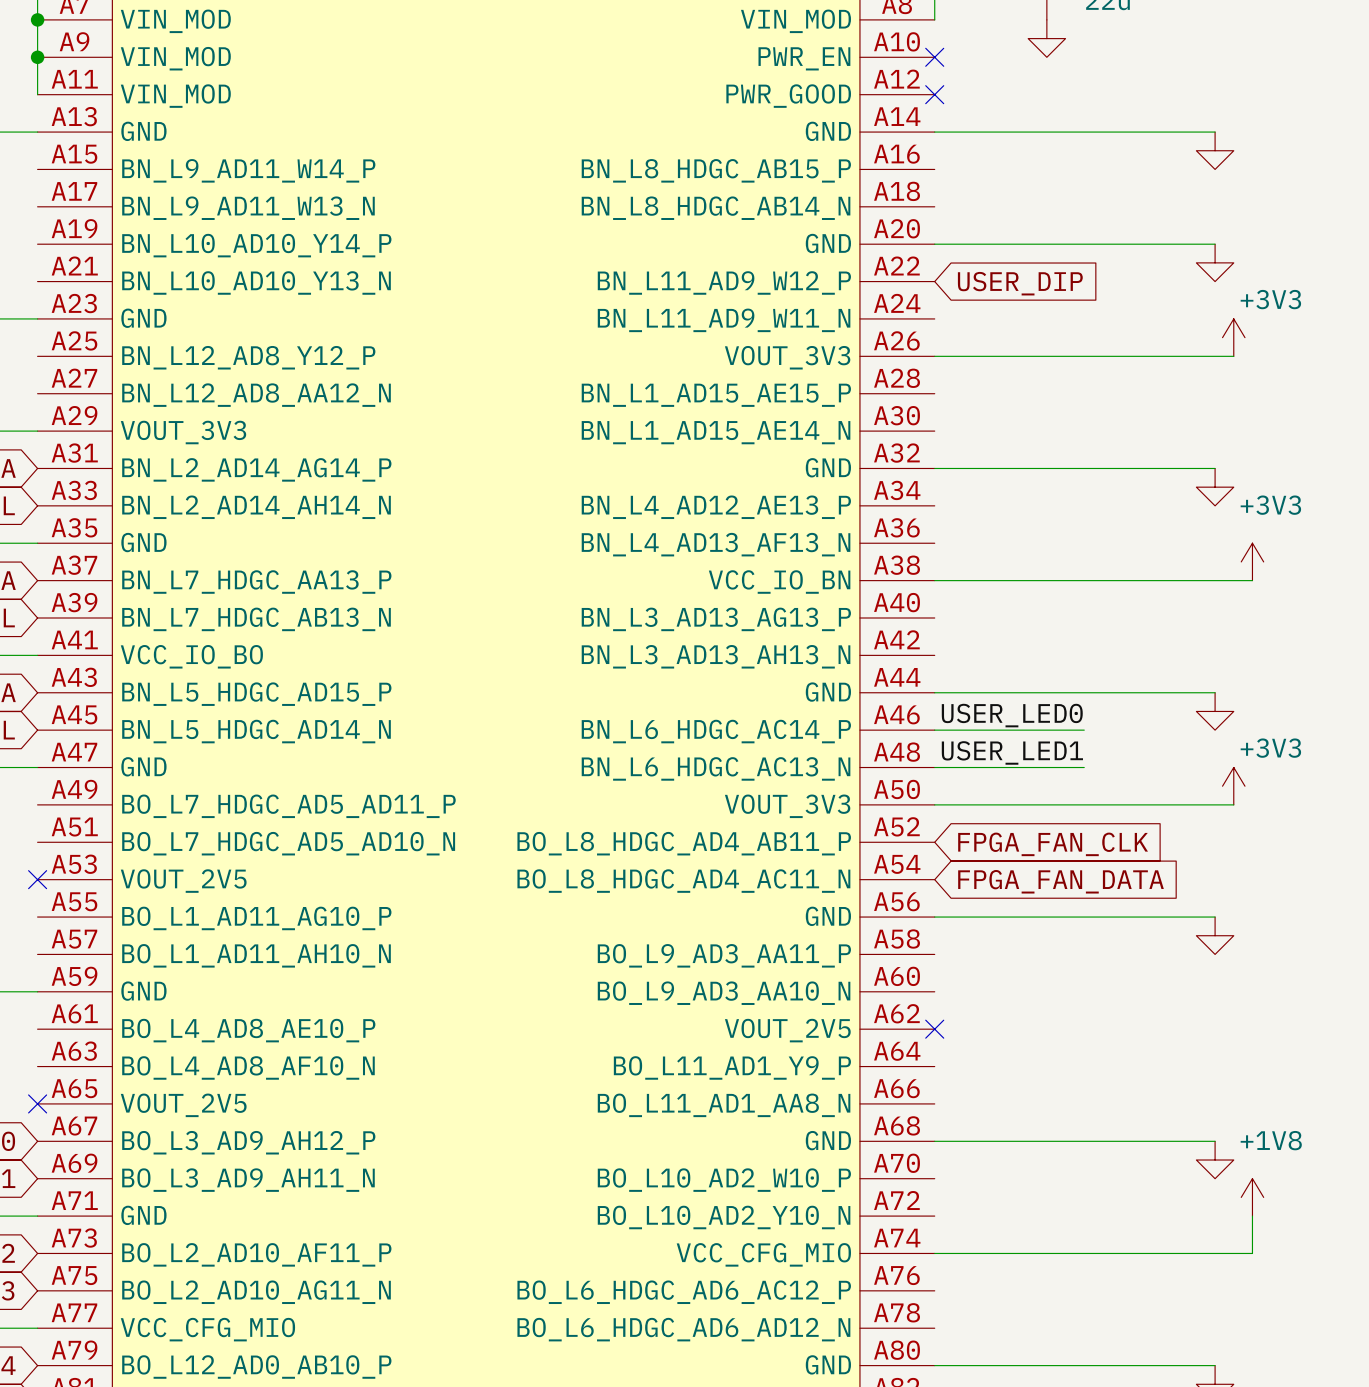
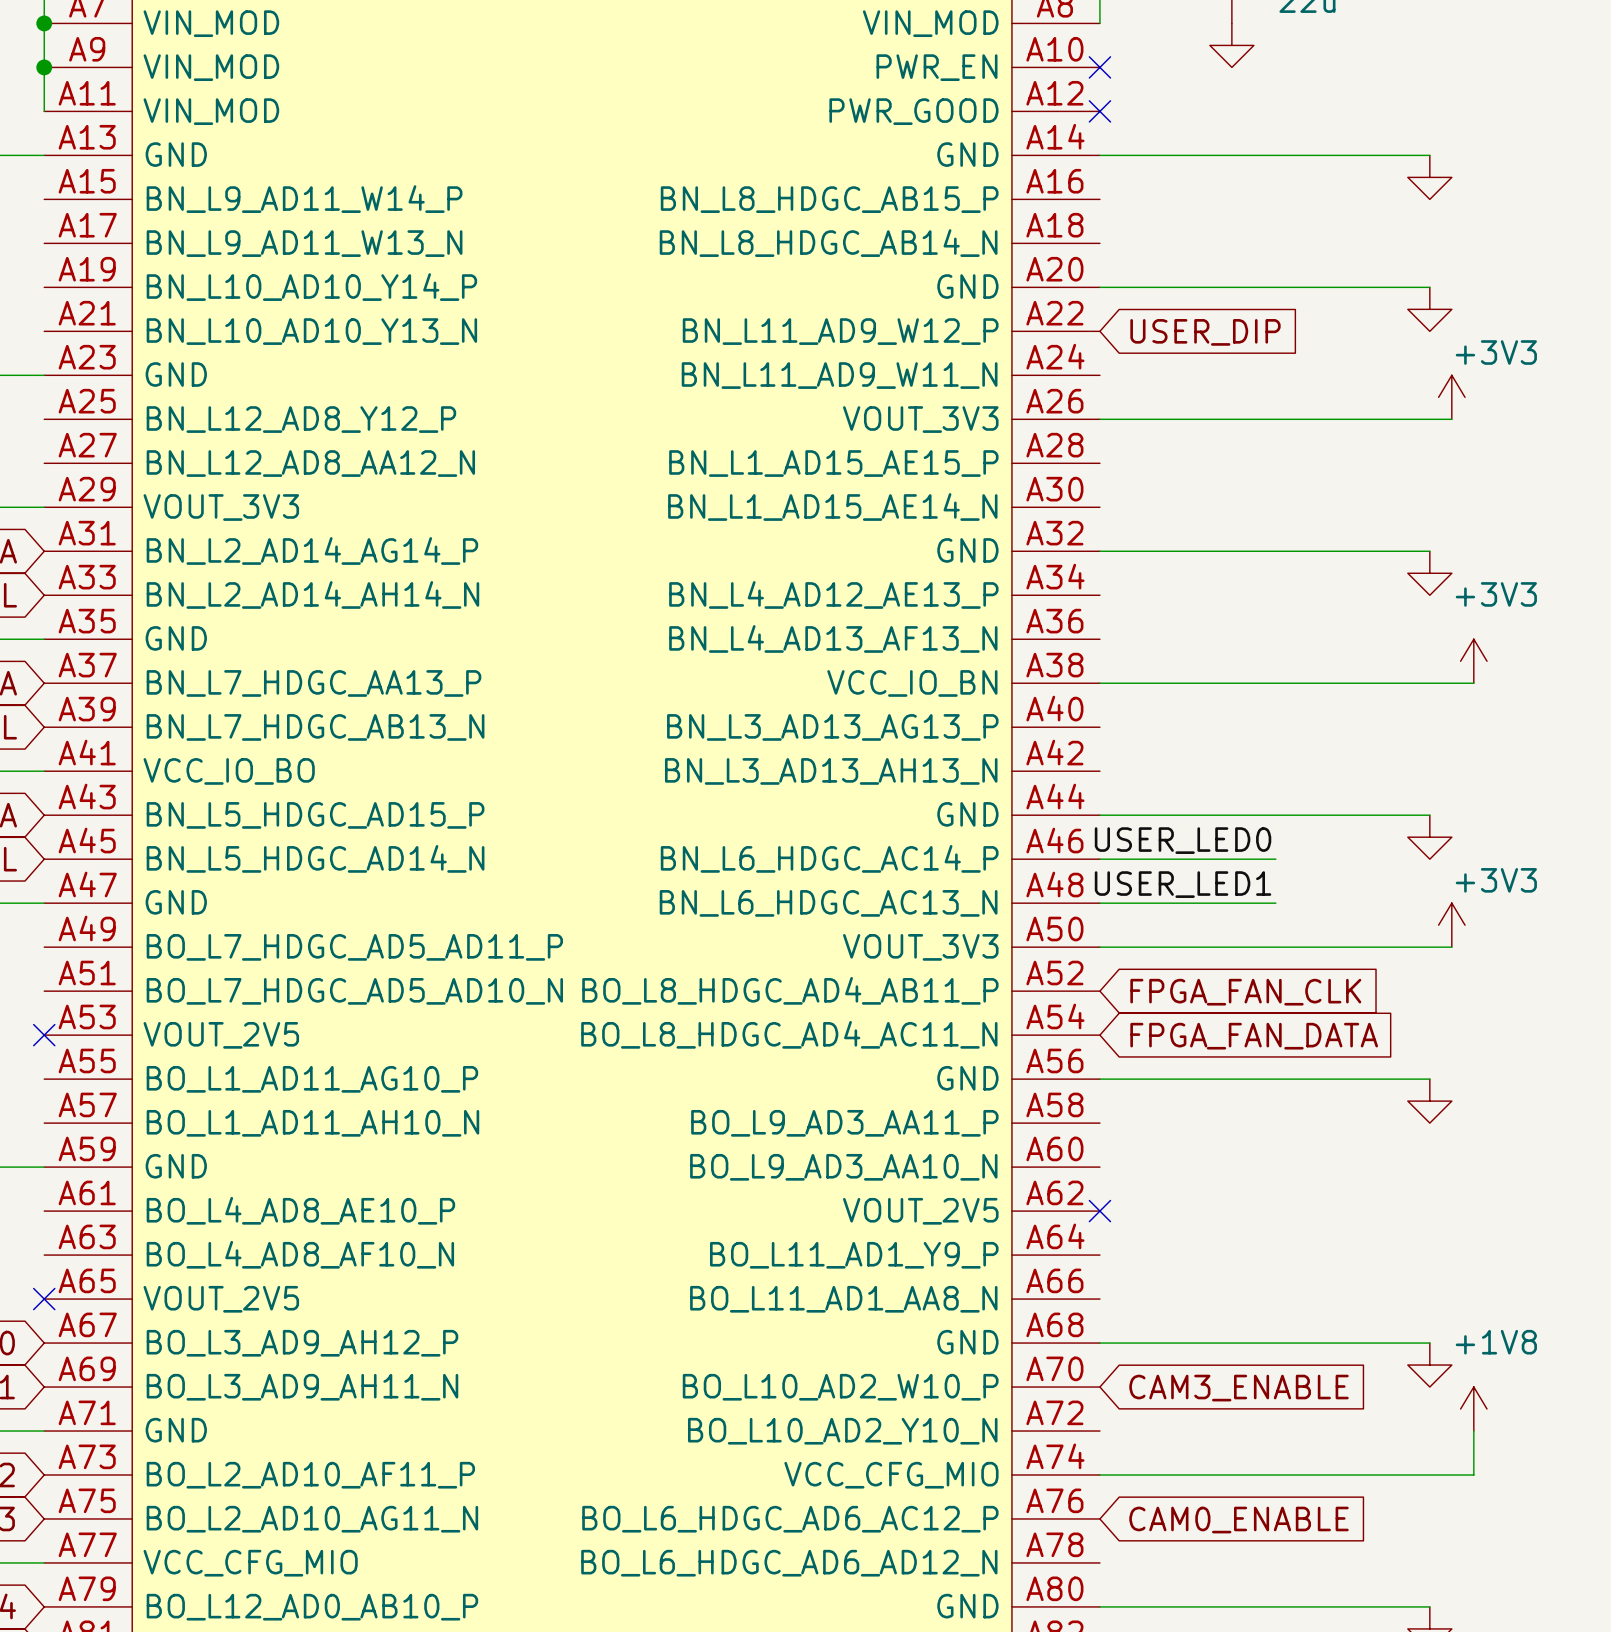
global label: none -> CAM3_ENABLE (1238, 1388)
global label: none -> CAM0_ENABLE (1238, 1520)

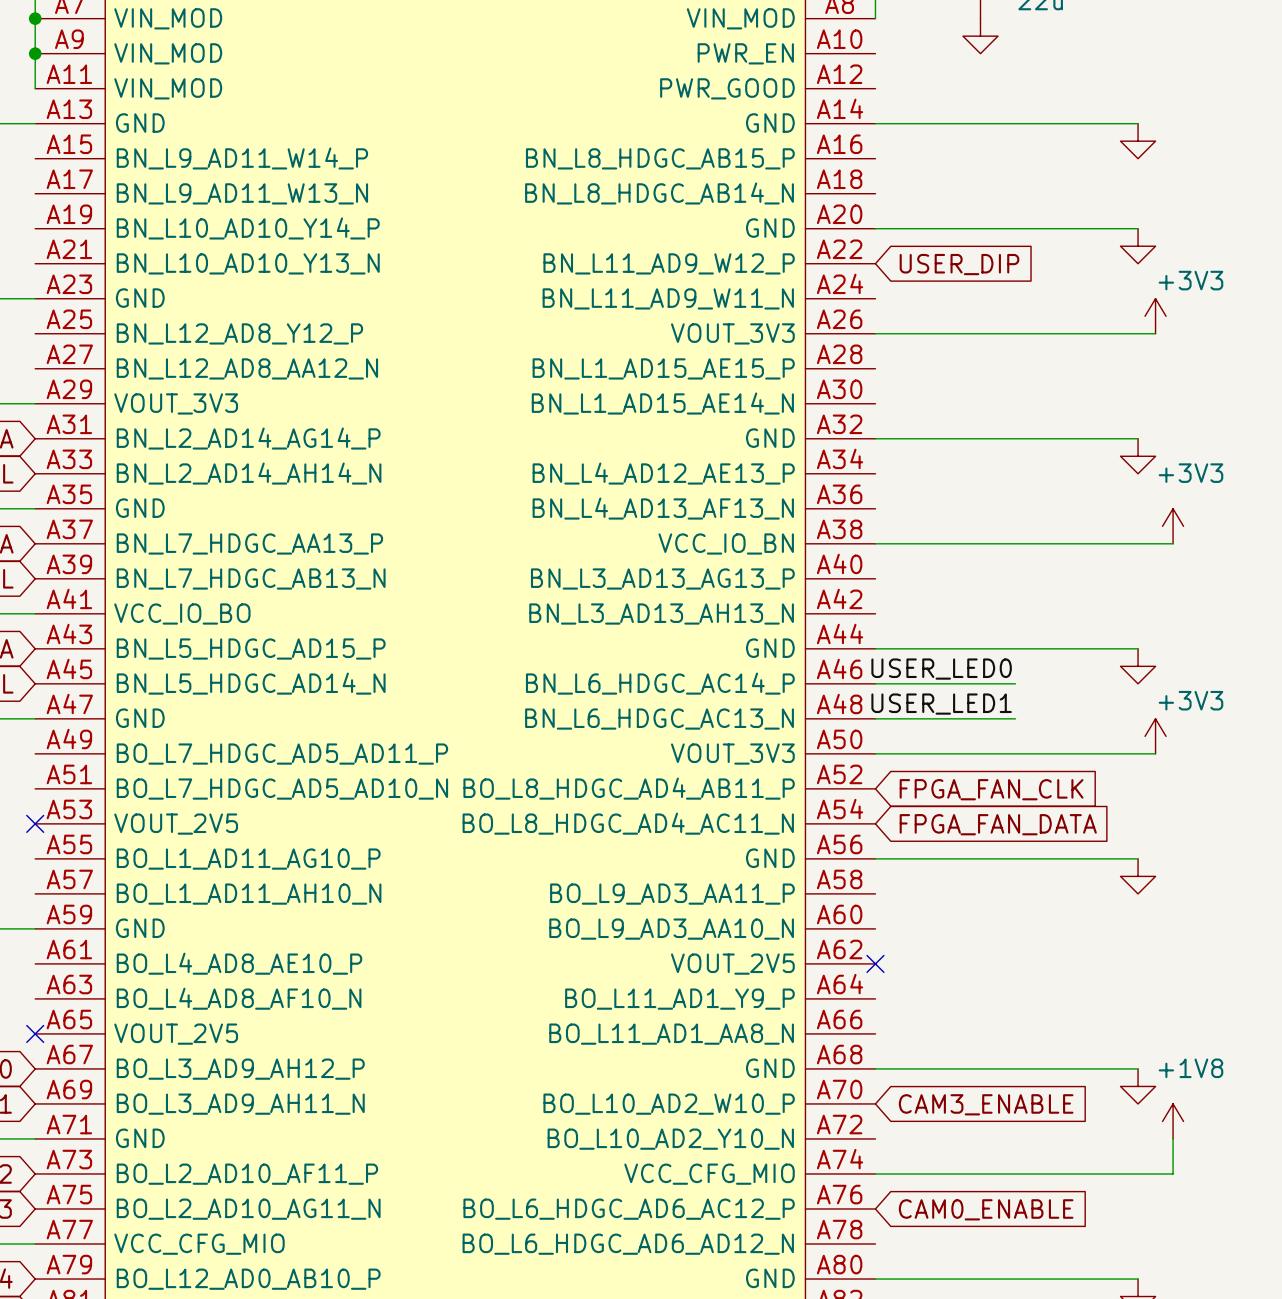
no-connect mark: (1099, 67) -> none
no-connect mark: (1099, 111) -> none

